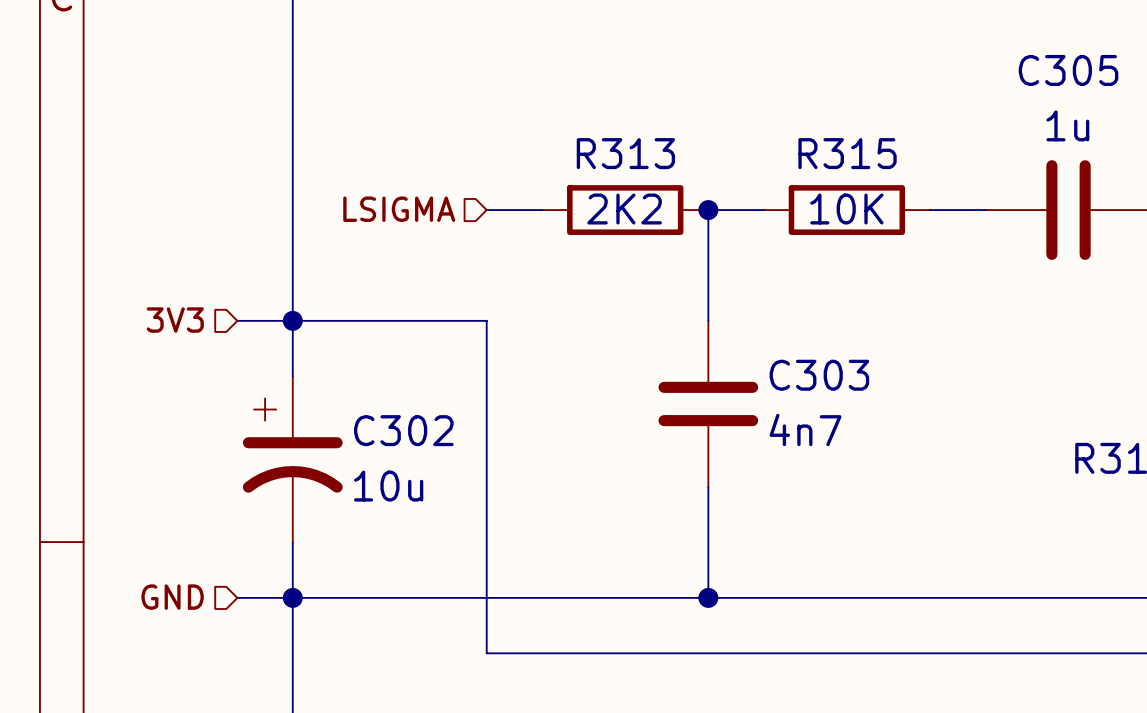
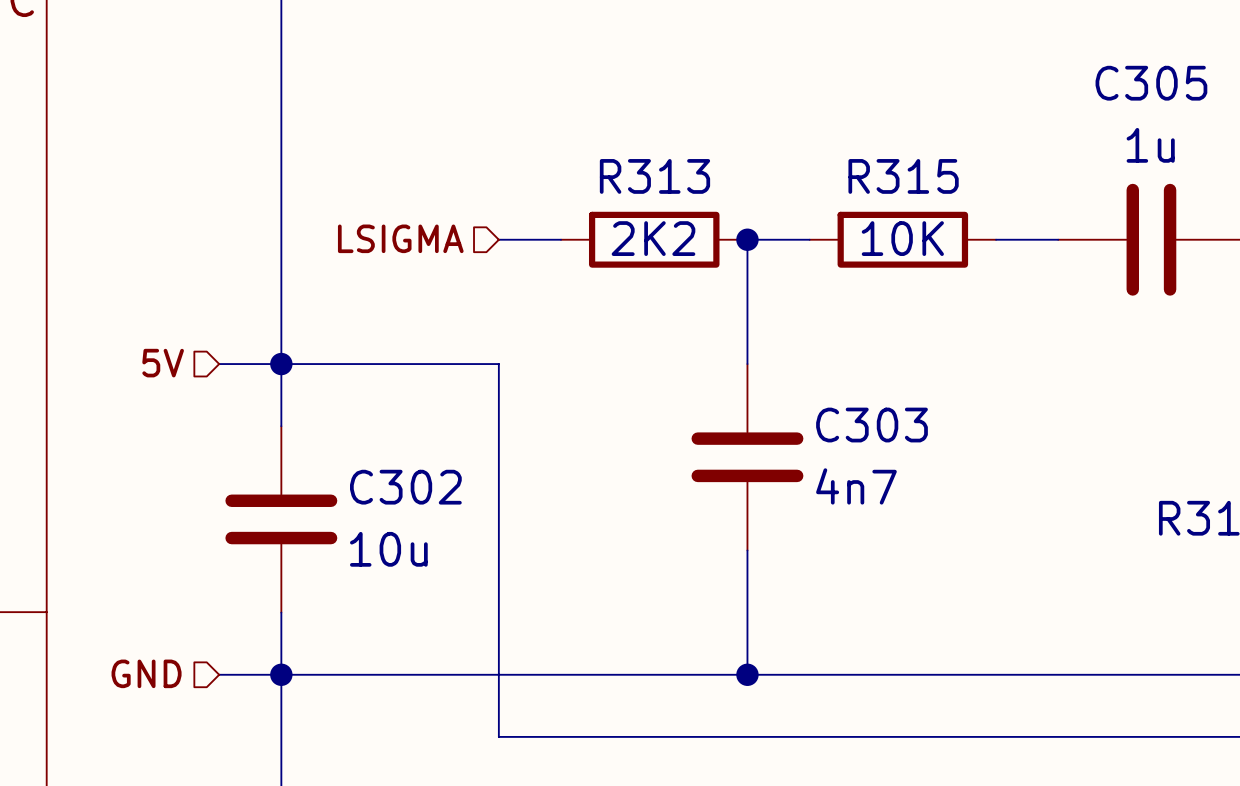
hierarchical label: 3V3 (175, 320) -> 5V (163, 363)
C302 symbol: [242, 376, 343, 543] -> [225, 426, 338, 613]

